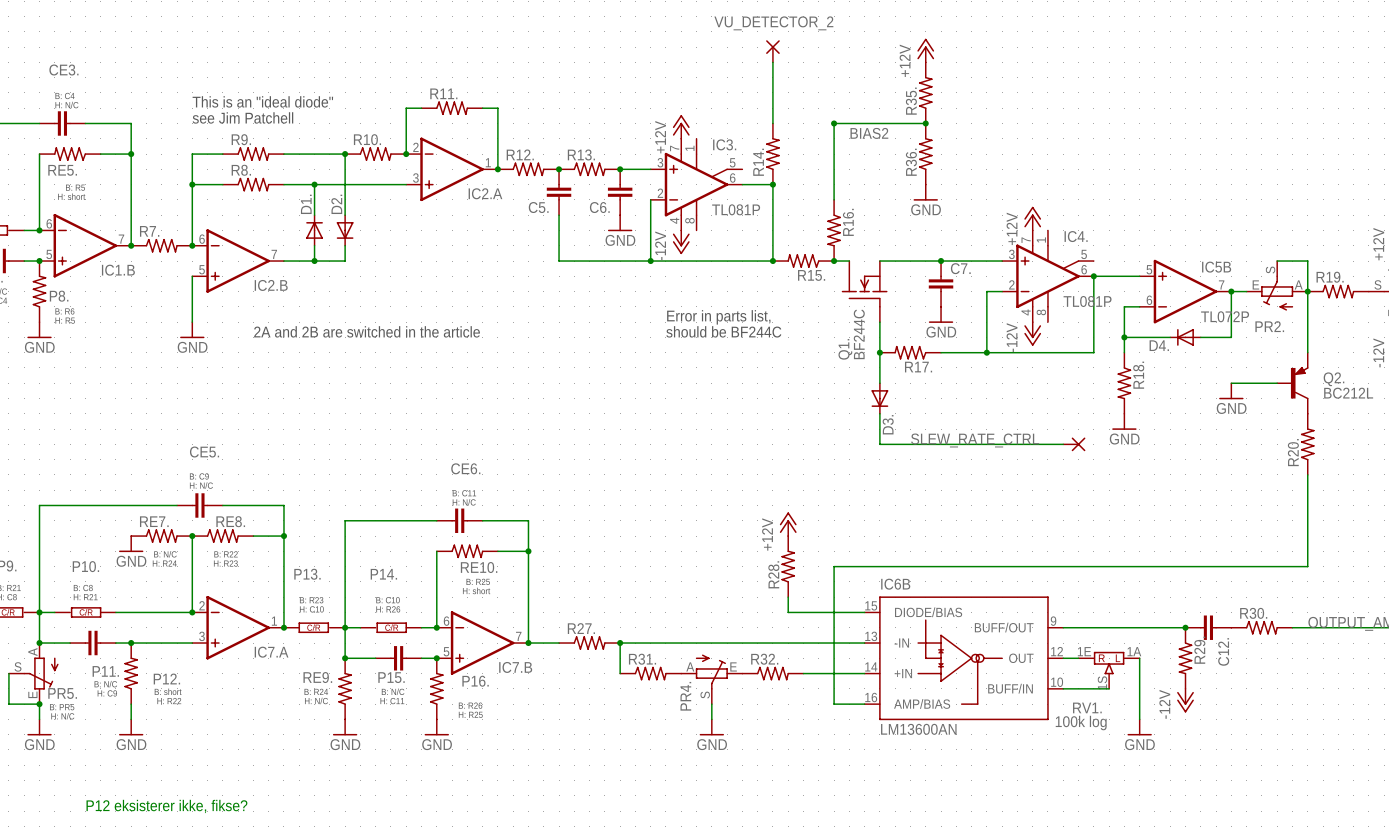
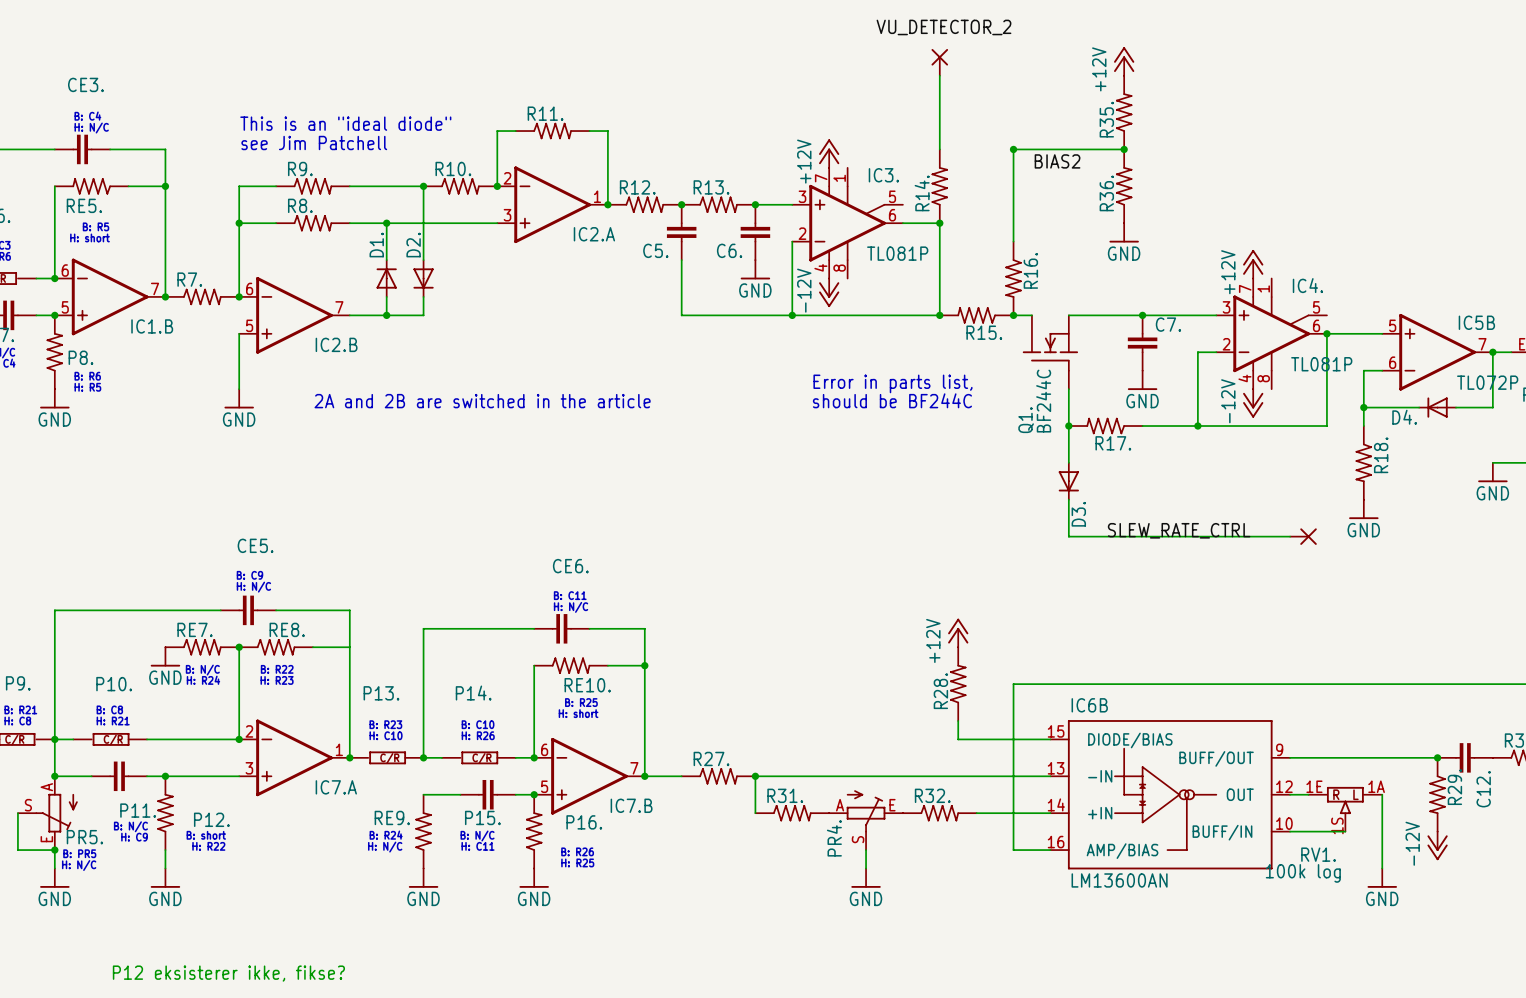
junction: (283, 536) -> none
P13. symbol: [283, 622, 346, 634] -> [349, 751, 424, 765]
wire: (345, 627) (345, 658) -> none
junction: (345, 658) -> none

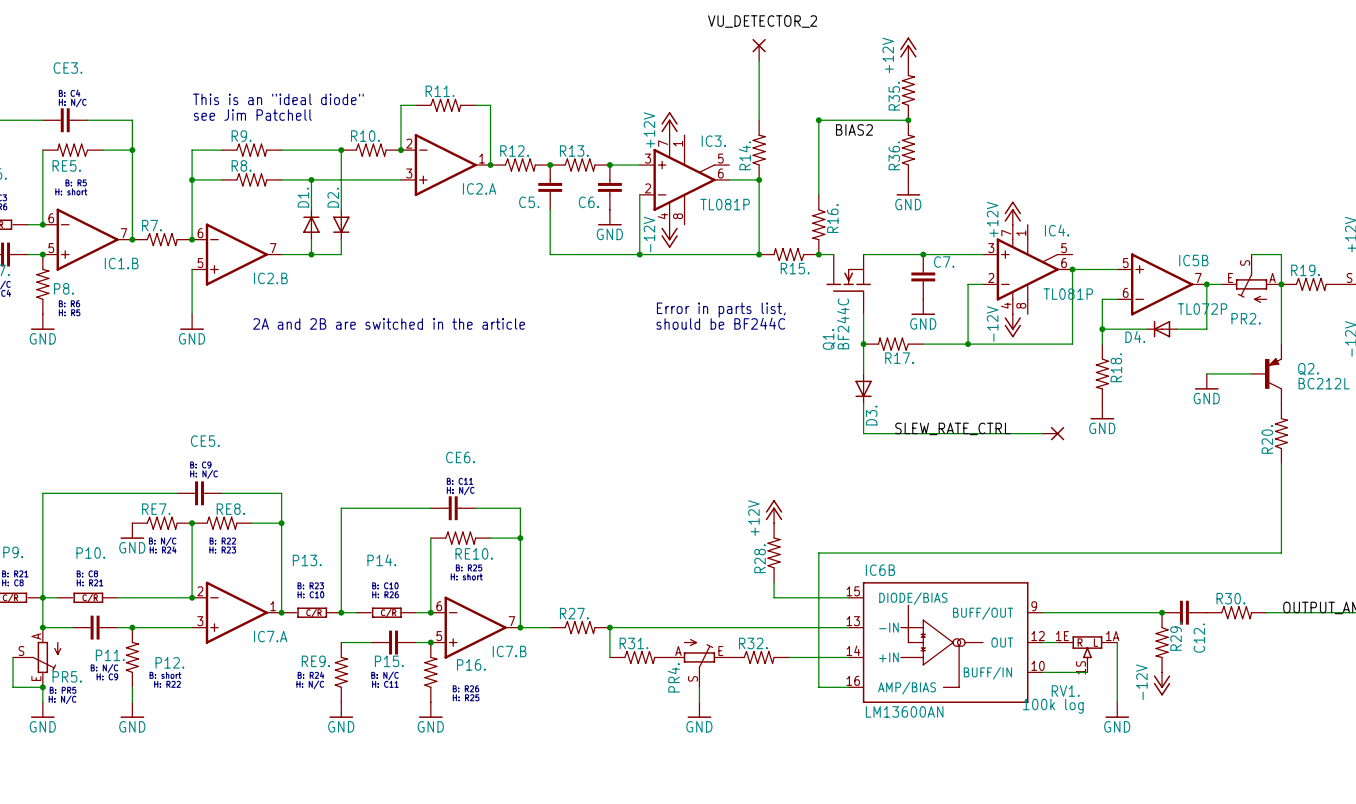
junction: none -> (281, 523)
text: P12 eksisterer ikke, fikse? (228, 973) -> none

